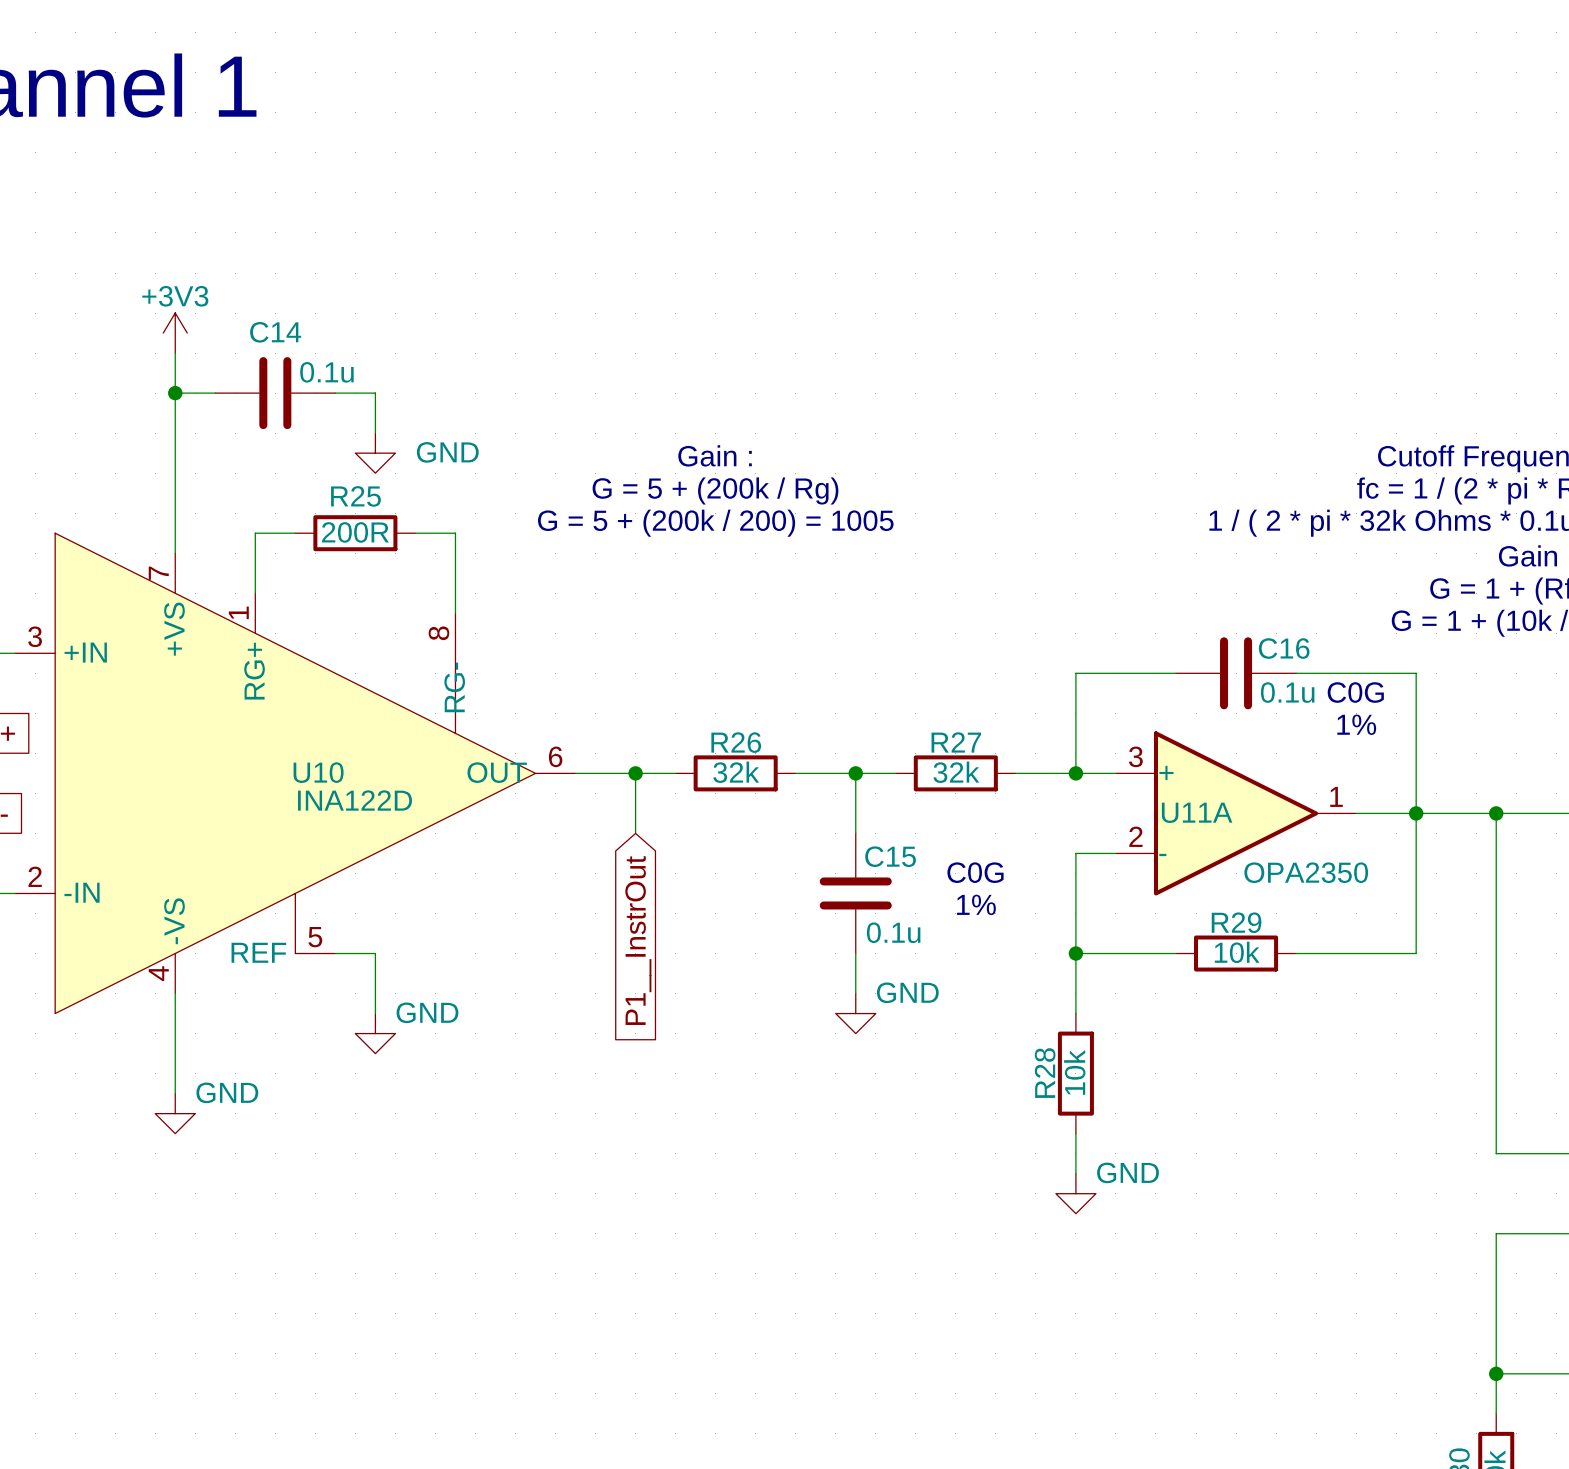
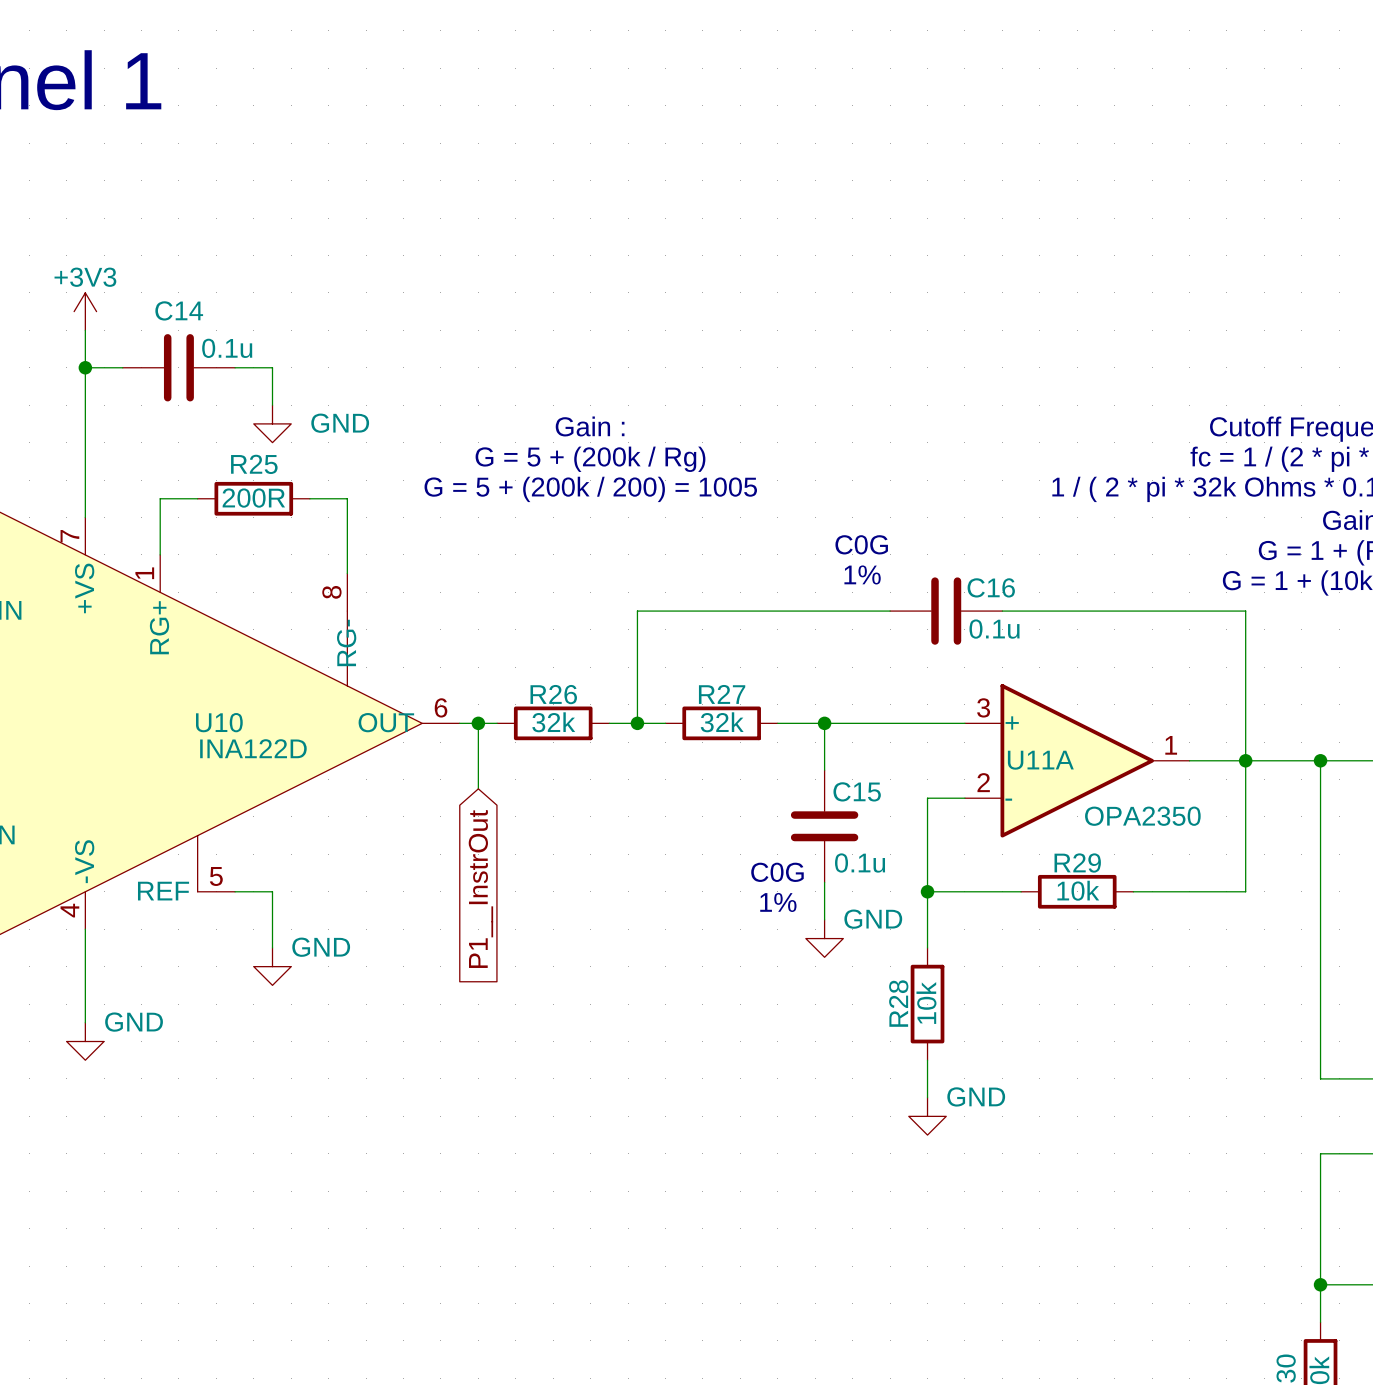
text: none -> C0G (861, 544)
text: none -> 1% (862, 574)
wire: none -> (890, 611) (637, 611) (637, 723)
wire: (1175, 673) (1075, 673) (1075, 773) -> none
C16 position: (1236, 673) -> (946, 611)
wire: (1296, 673) (1416, 673) -> (1002, 611) (1245, 611) (1245, 629)
text: C0G (1355, 692) -> none
text: 1% (1356, 724) -> none
wire: none -> (478, 723) (478, 788)
wire: (615, 773) (675, 773) -> none
wire: (635, 773) (635, 833) -> none
junction position: (635, 773) -> (478, 723)
R26 position: (735, 773) -> (553, 723)
junction: none -> (637, 723)
wire: (795, 773) (895, 773) -> (665, 723) (609, 723)
wire: (855, 773) (855, 833) -> none
junction: (855, 773) -> none
wire: none -> (777, 723) (871, 723)
R27 position: (955, 773) -> (721, 723)
wire: none -> (824, 723) (824, 770)
junction: none -> (824, 723)
junction: (1075, 773) -> none
text position: C0G (975, 872) -> C0G (777, 872)
C15 position: (855, 893) -> (824, 826)
text position: 1% (976, 904) -> 1% (778, 902)
global label position: P1__InstrOut (638, 940) -> P1__InstrOut (480, 889)
wire: (855, 953) (855, 993) -> (824, 882) (824, 919)
power symbol position: GND (855, 1013) -> GND (824, 938)

